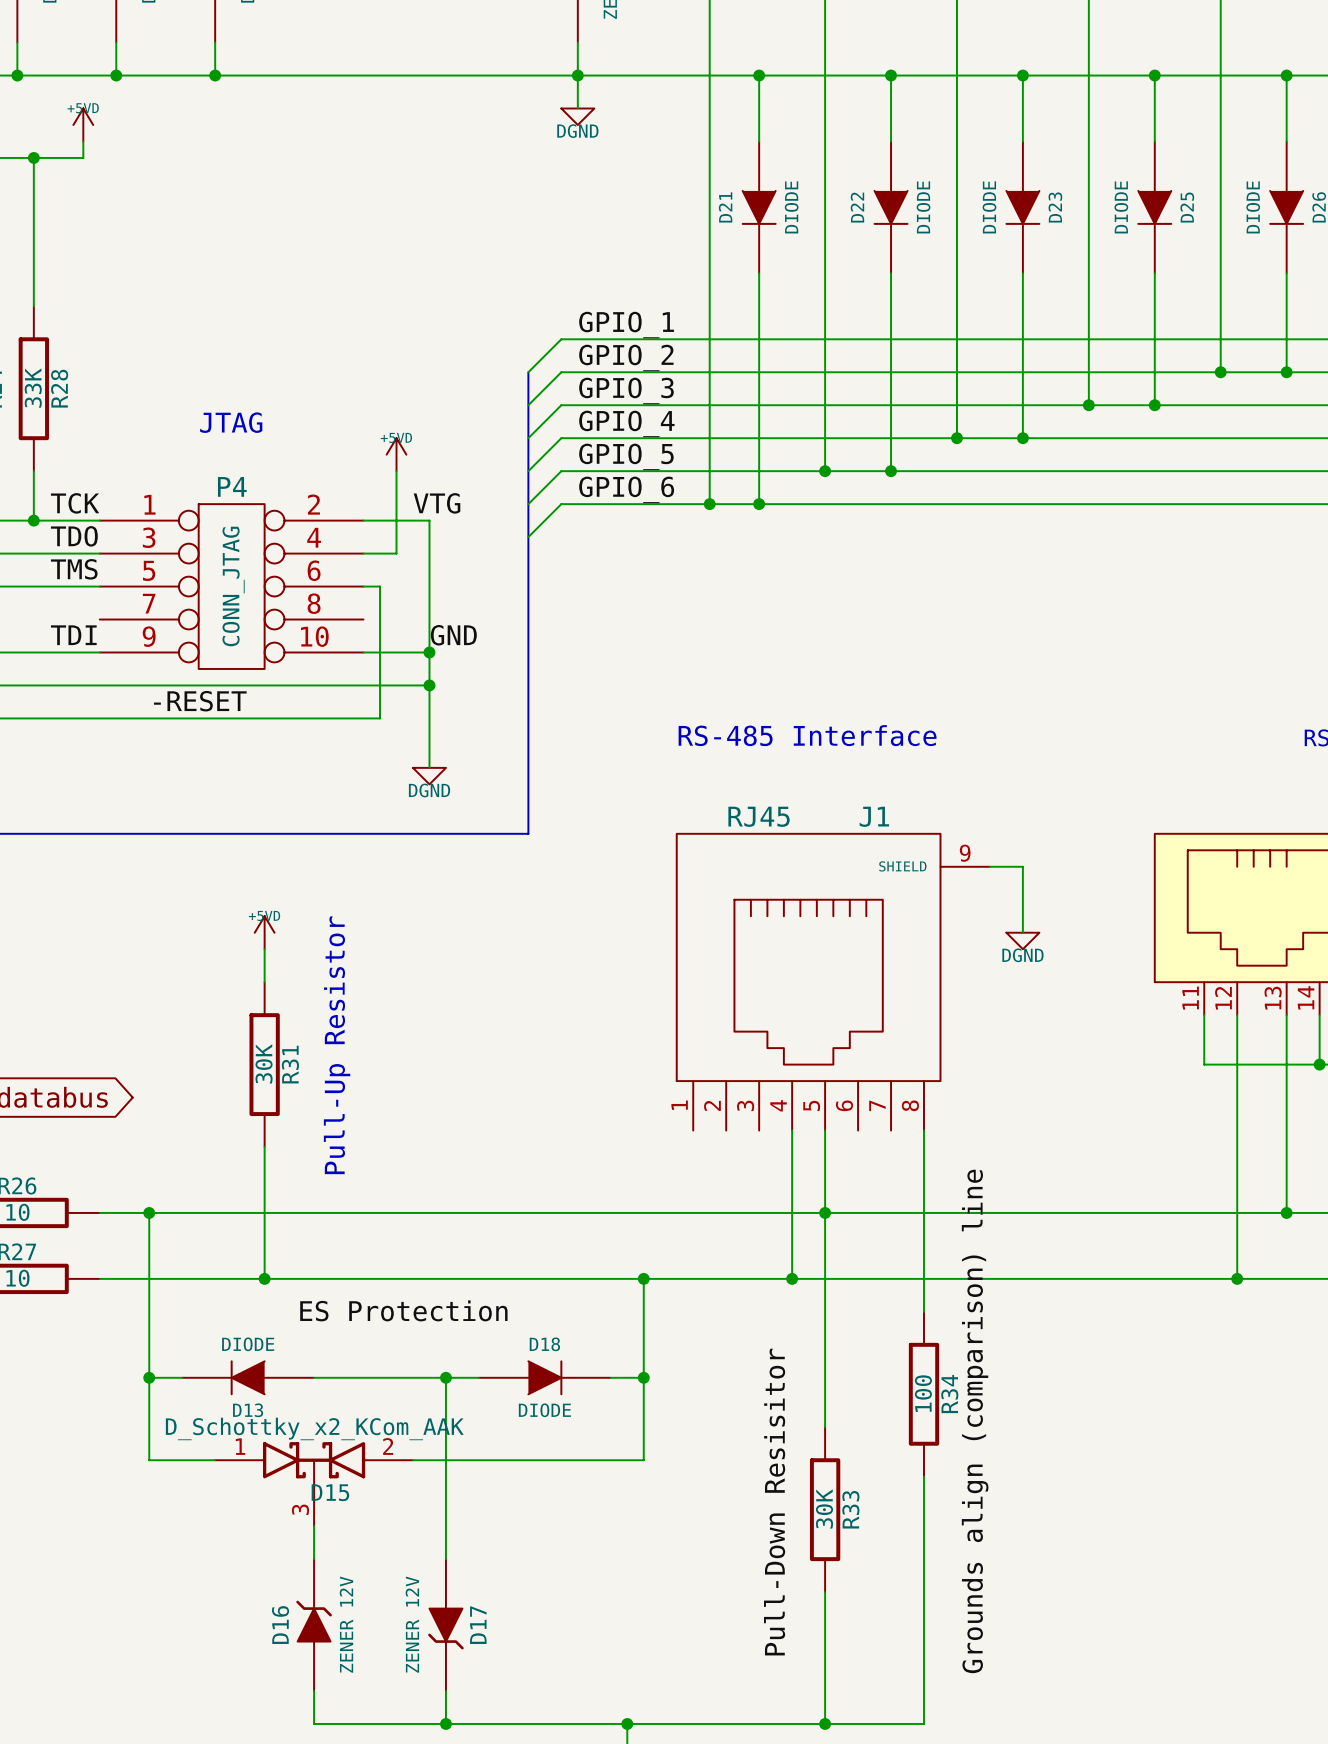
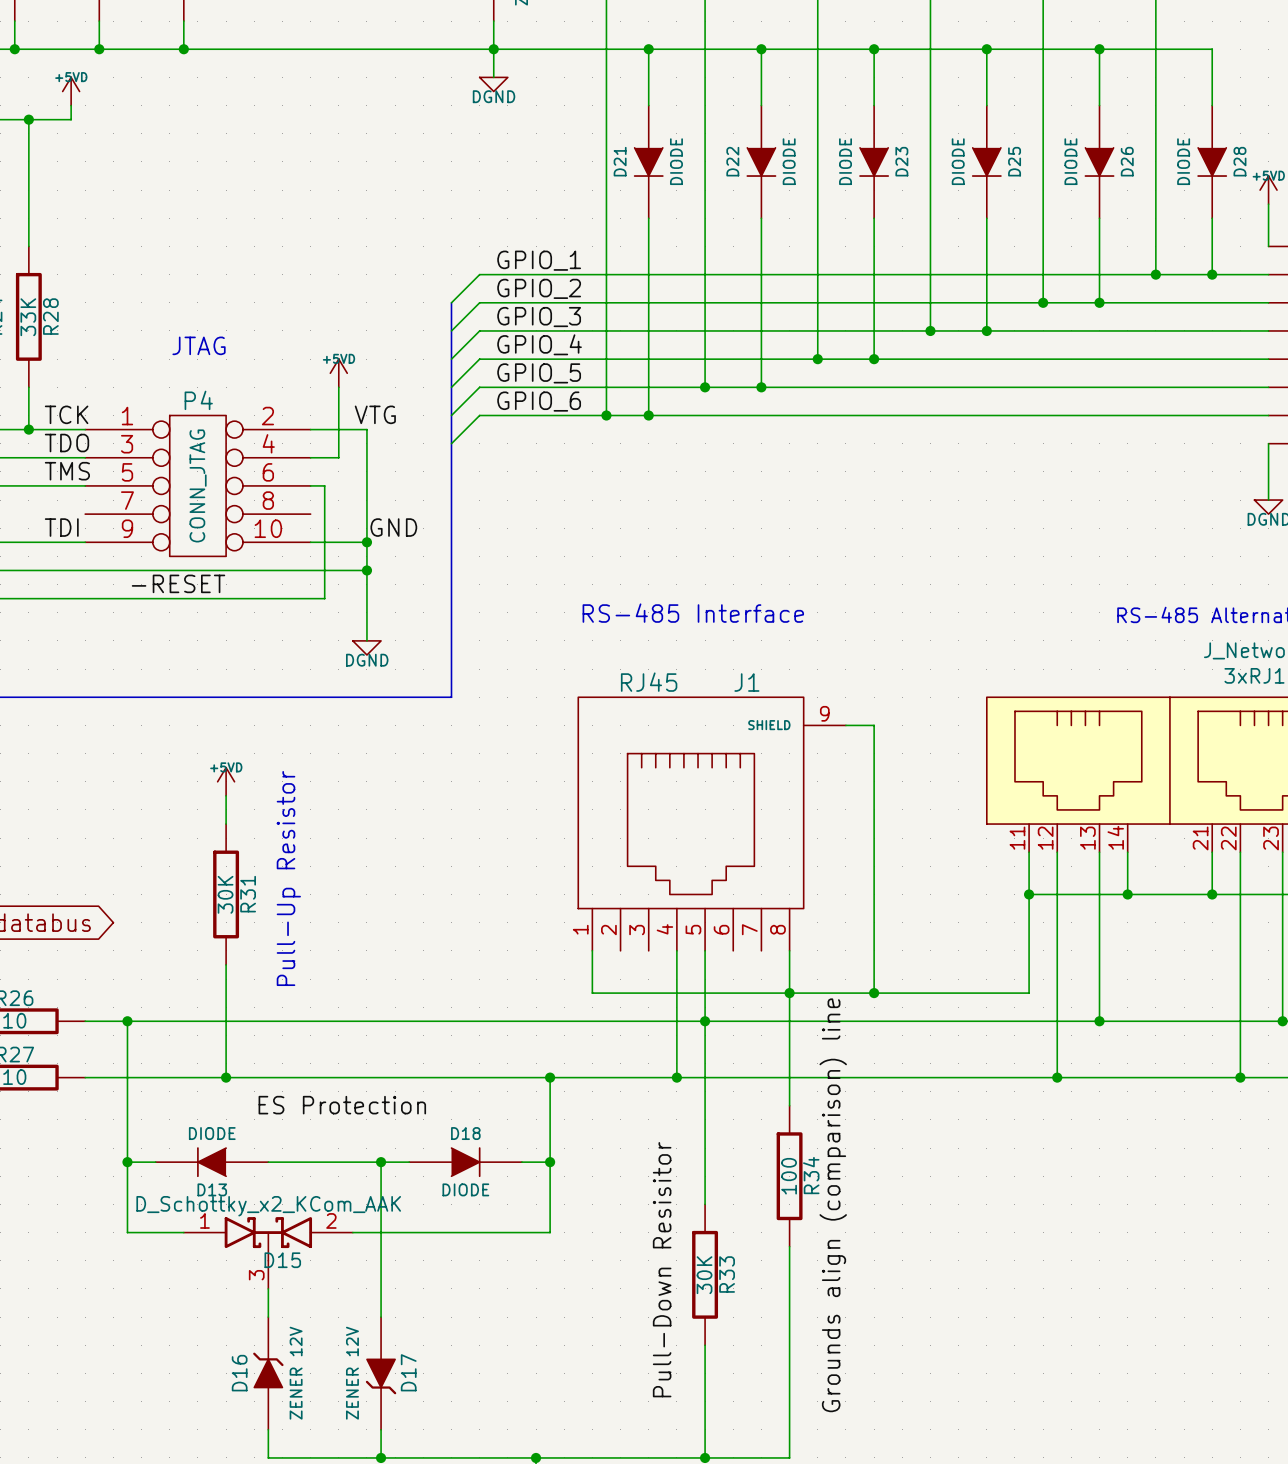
wire: none -> (874, 781) (874, 993)
power symbol: DGND (1022, 940) -> none
wire: none -> (1029, 894) (1029, 993) (592, 993) (592, 950)
junction: none -> (1029, 894)
junction: none -> (789, 993)
junction: none -> (874, 993)

